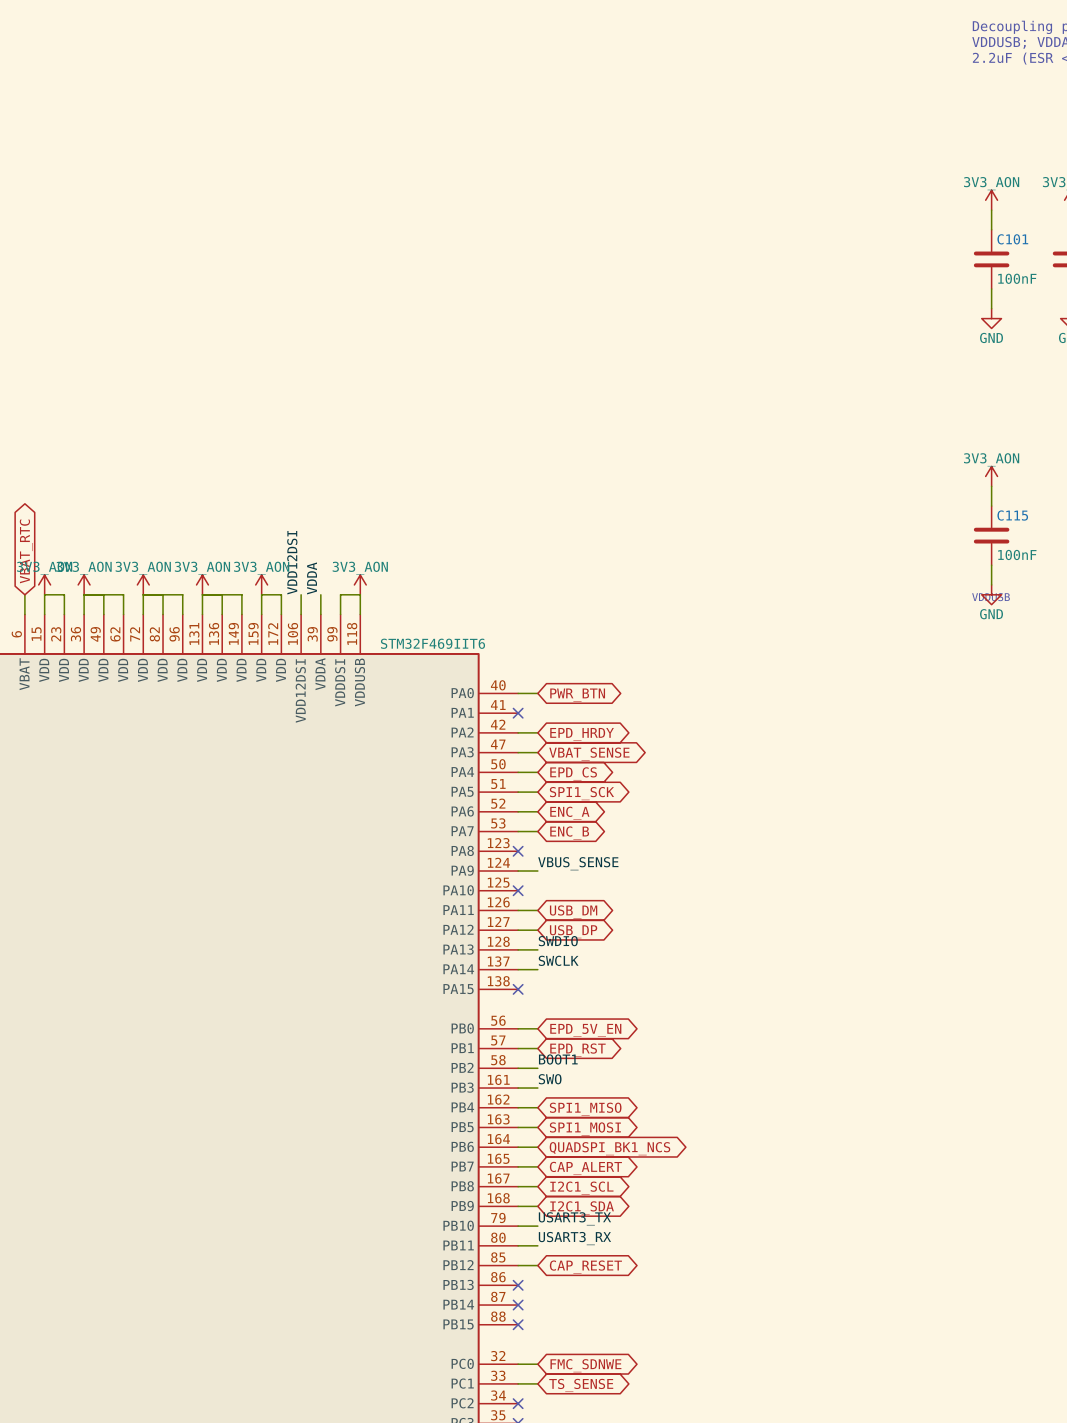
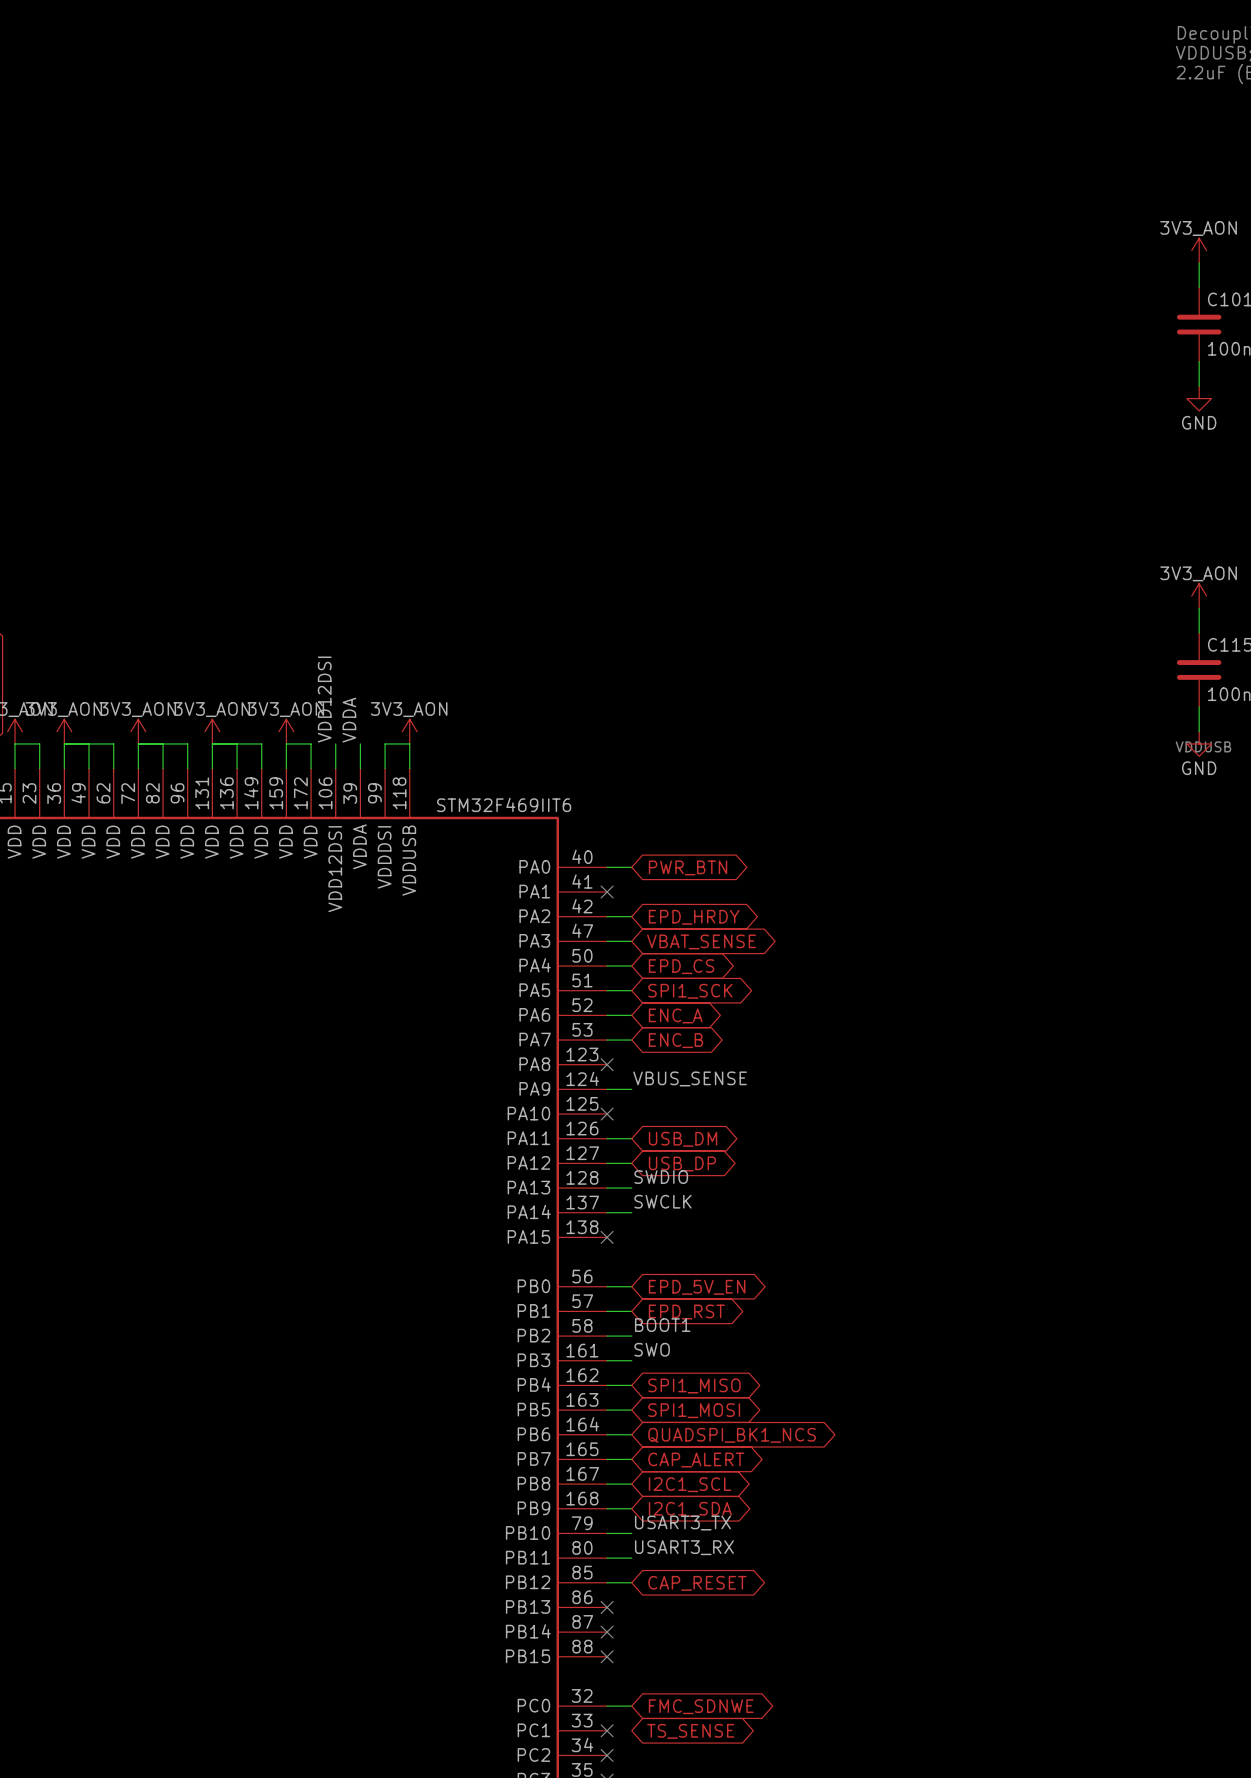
wire: (518, 1383) (537, 1383) -> none
no-connect mark: none -> (607, 1730)

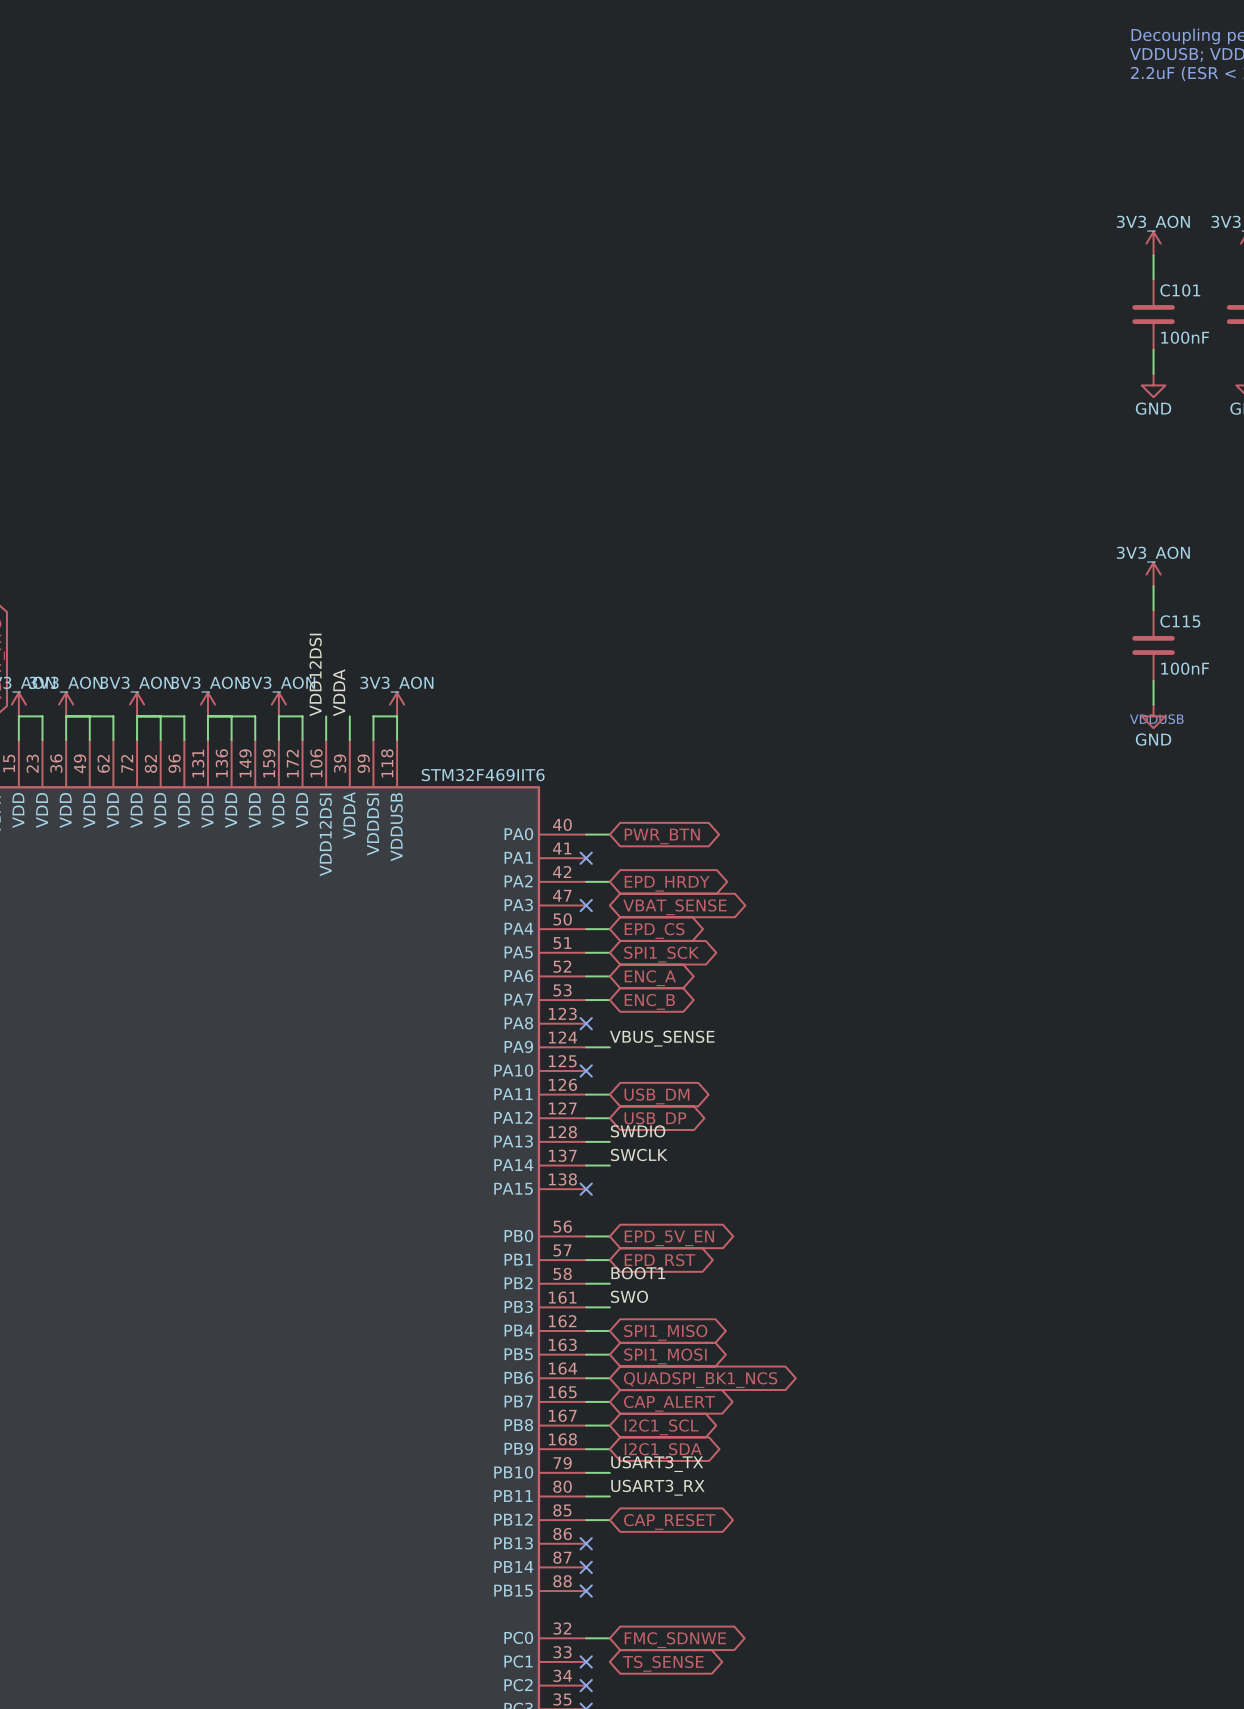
wire: (607, 941) (631, 941) -> none
no-connect mark: none -> (586, 905)

